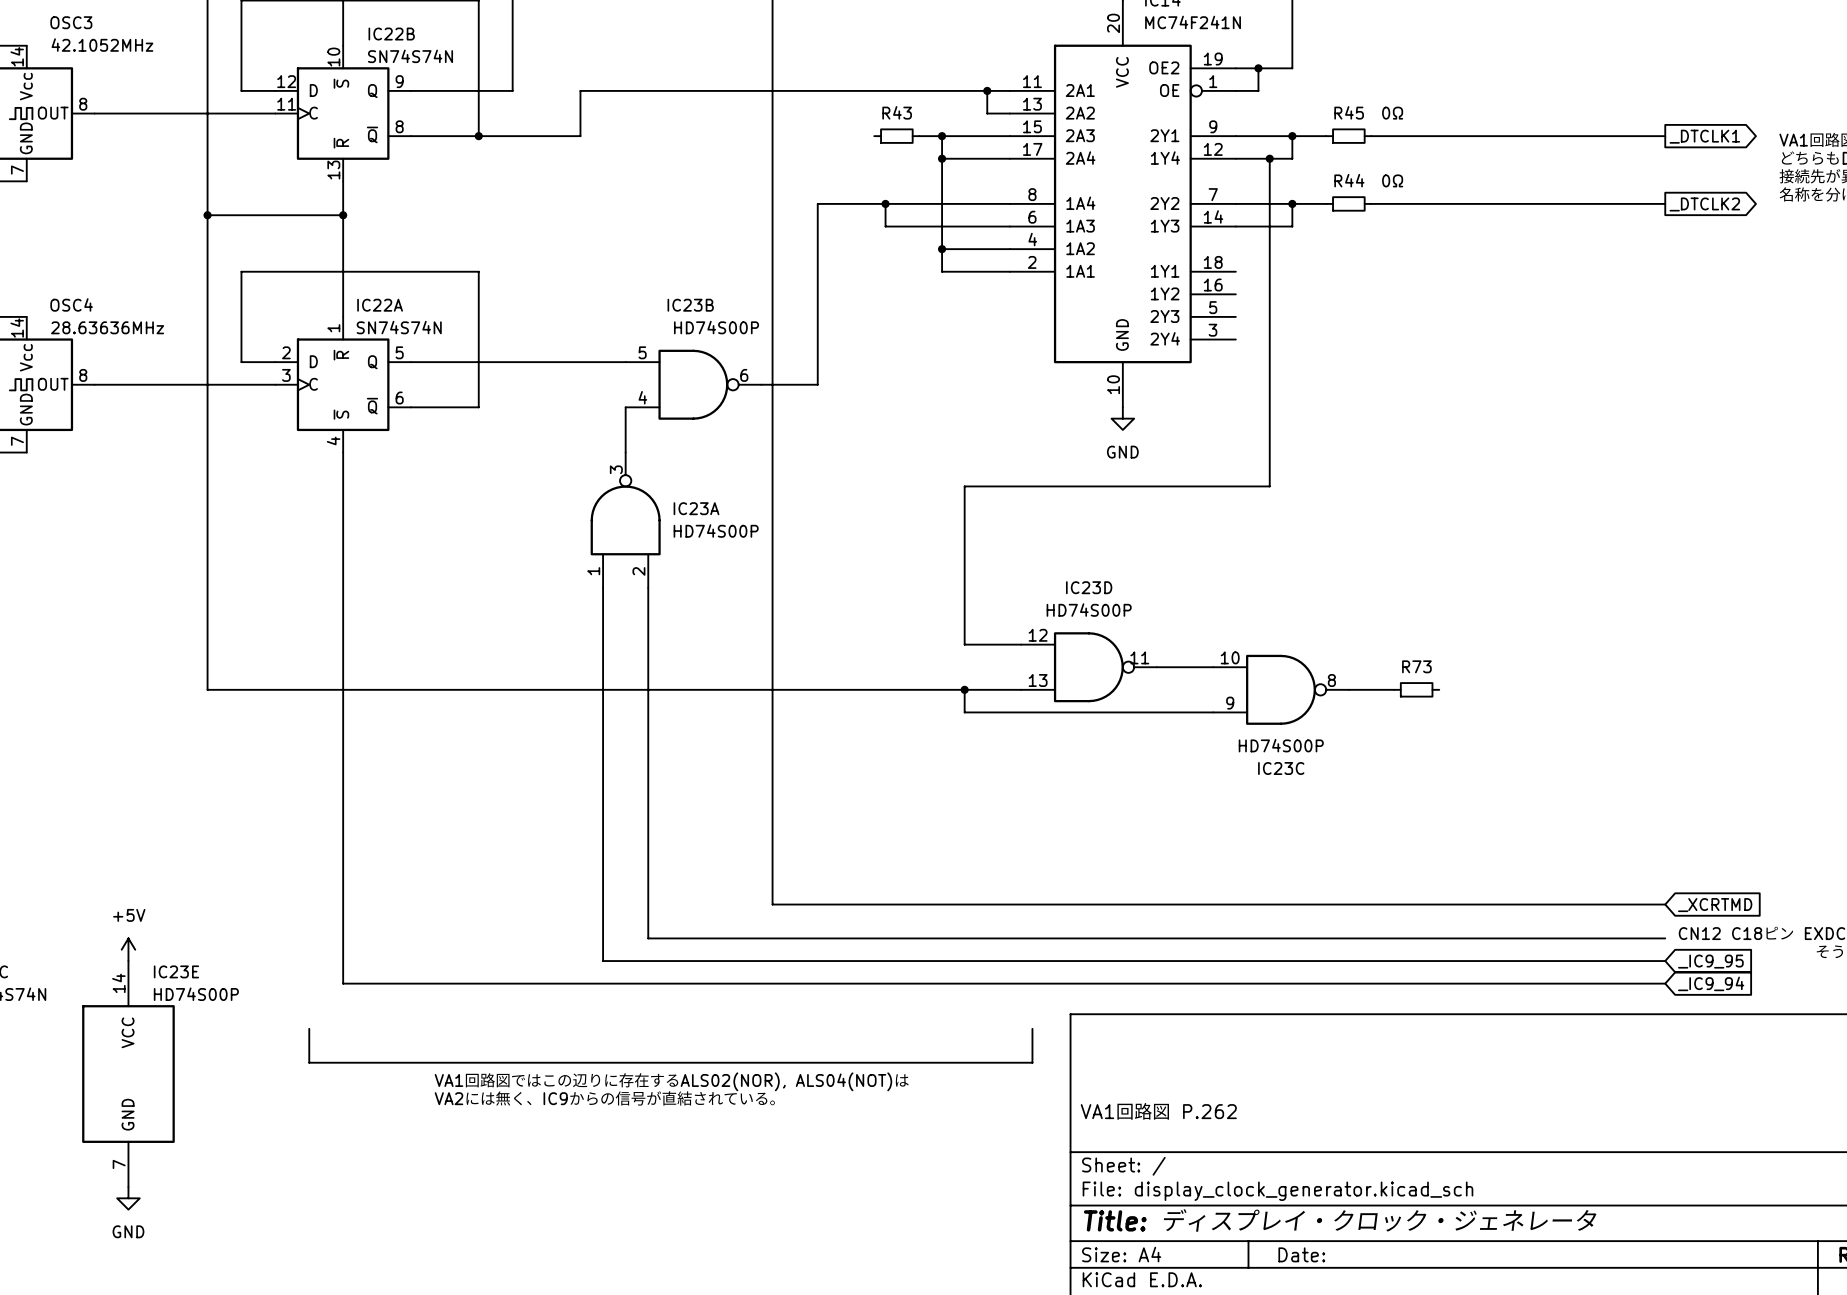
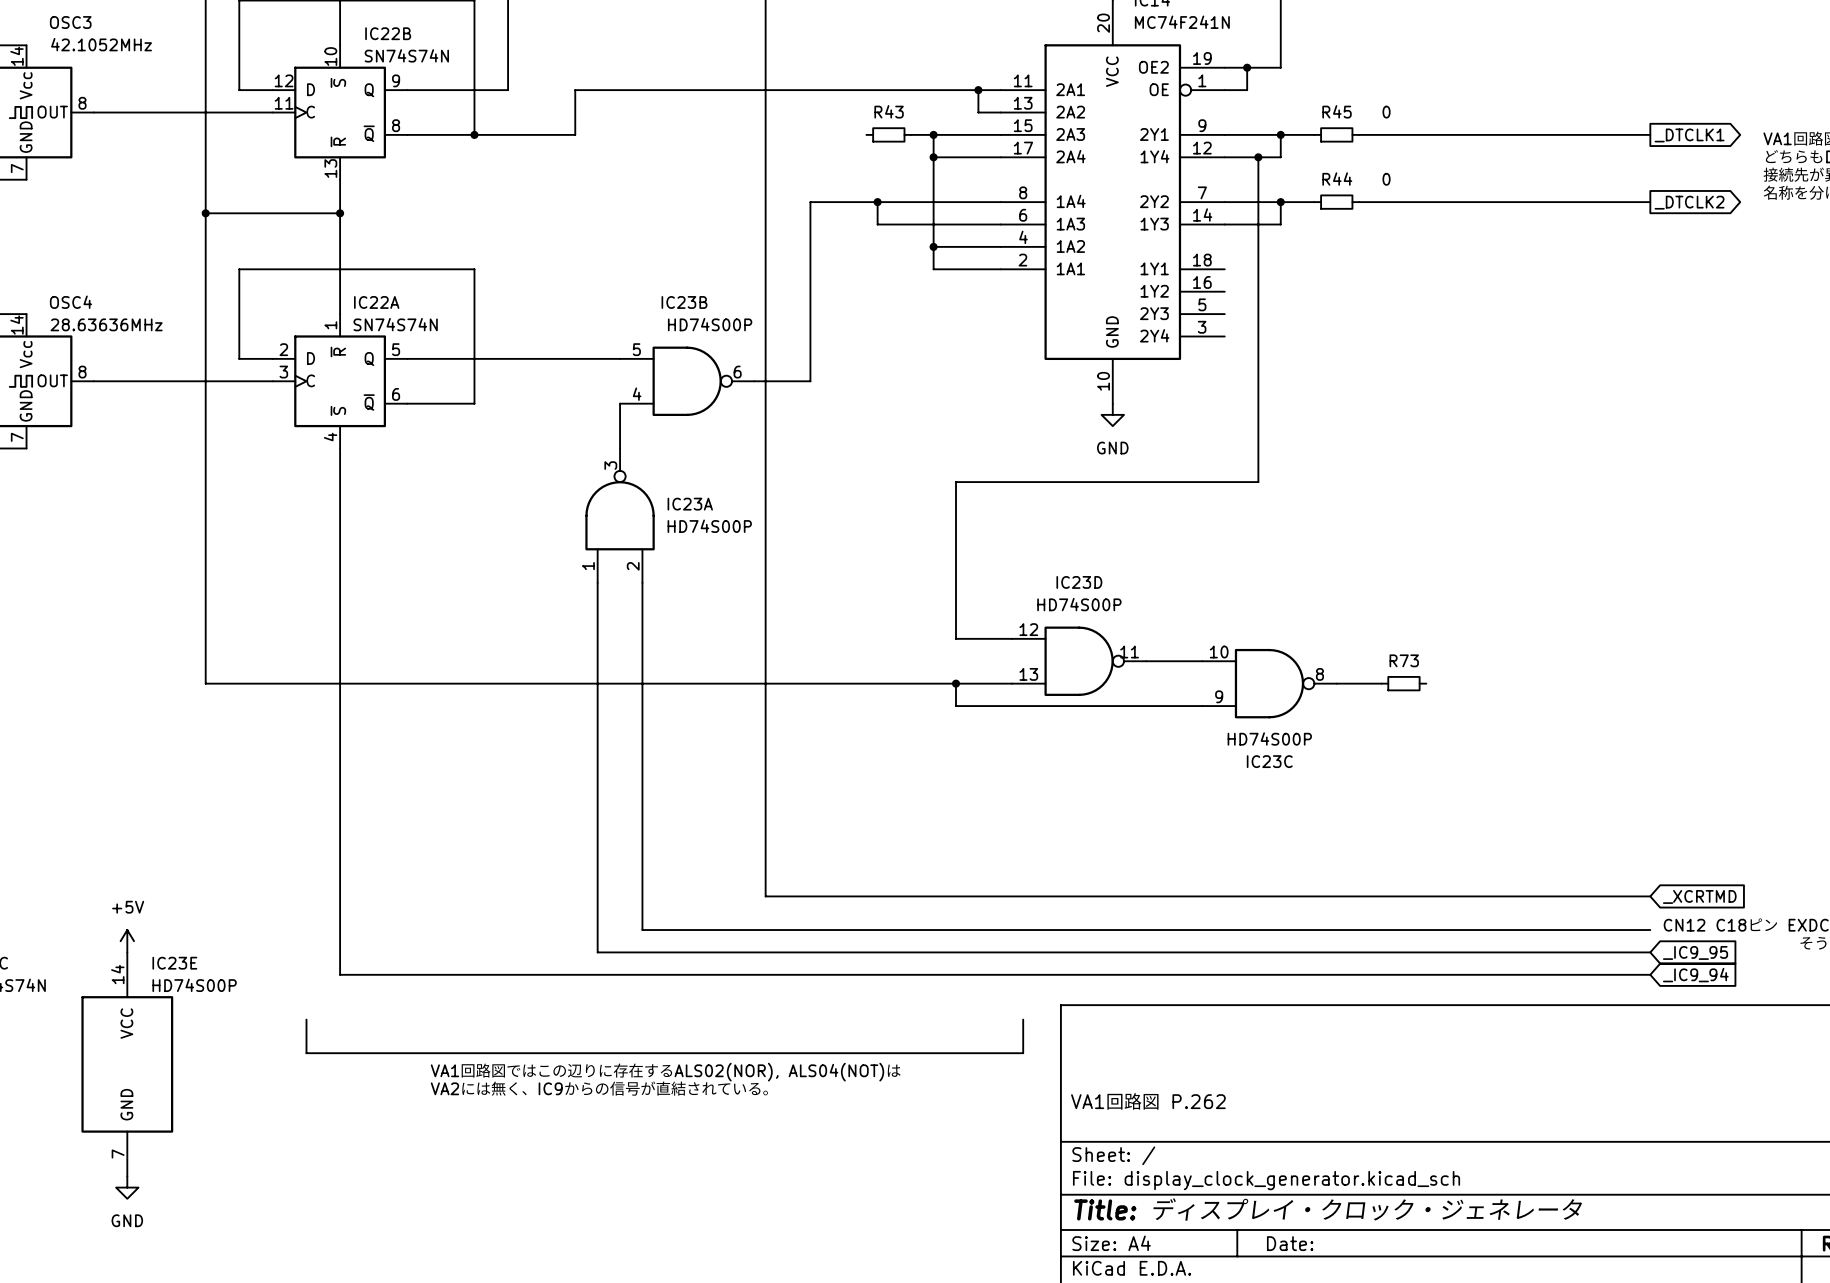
R45 value: 0Ω (1392, 113) -> 0 (1386, 112)
R44 value: 0Ω (1392, 180) -> 0 (1386, 179)

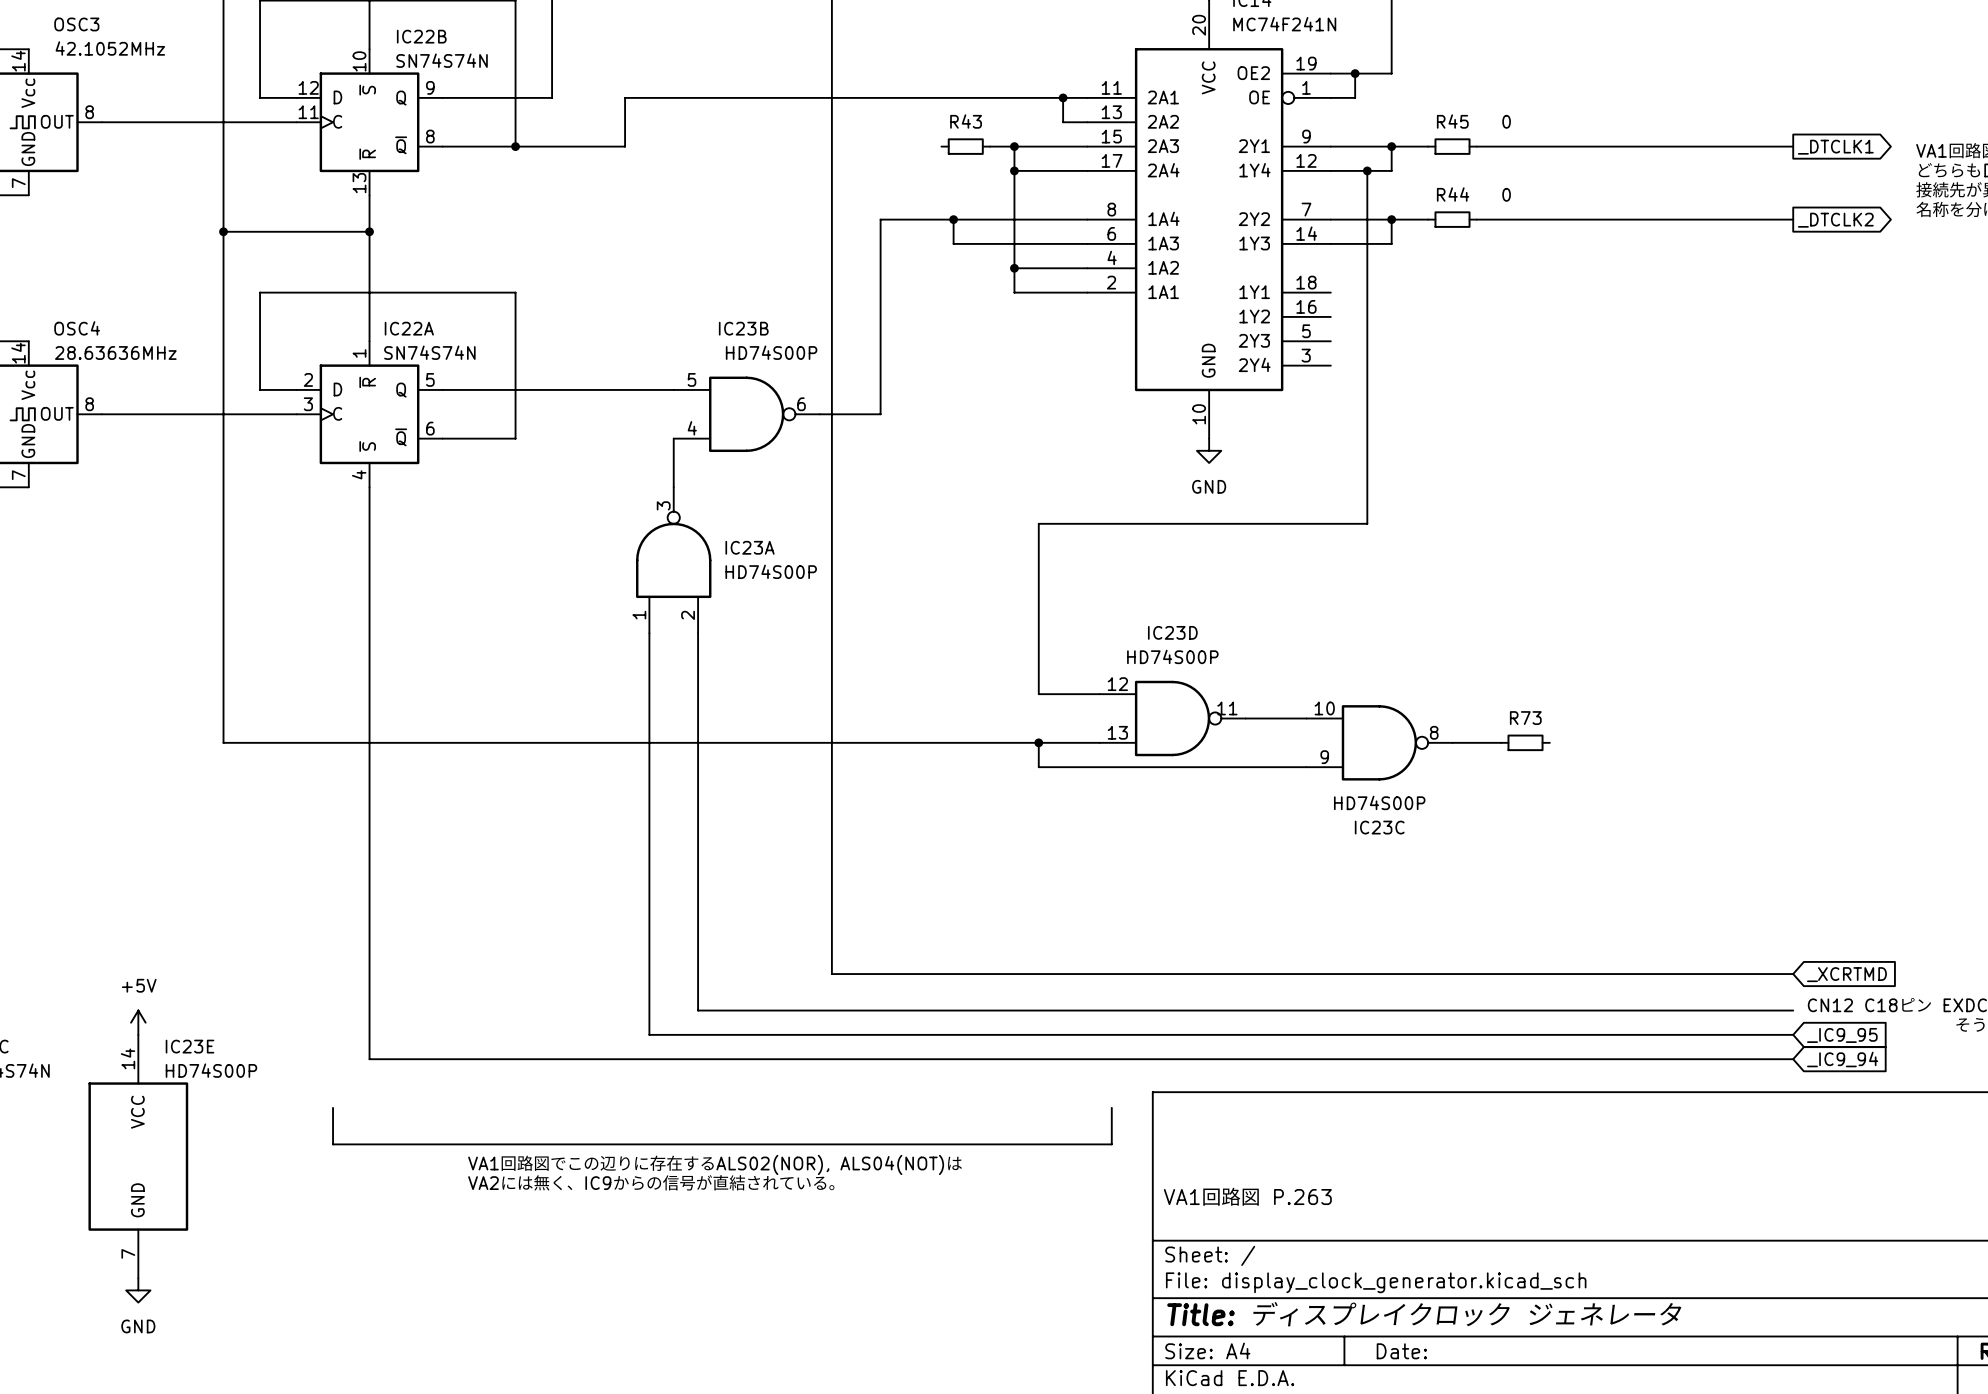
text: VA1回路図ではこの辺りに存在するALS02(NOR), ALS04(NOT)は (666, 1072) -> VA1回路図でこの辺りに存在するALS02(NOR), ALS04(NOT)は (715, 1164)
title block: VA1回路図 P.262 (1148, 1101) -> VA1回路図 P.263 (1247, 1196)
title block: Title: ディスプレイ・クロック・ジェネレータ (1329, 1209) -> Title: ディスプレイクロック ジェネレータ (1425, 1314)

